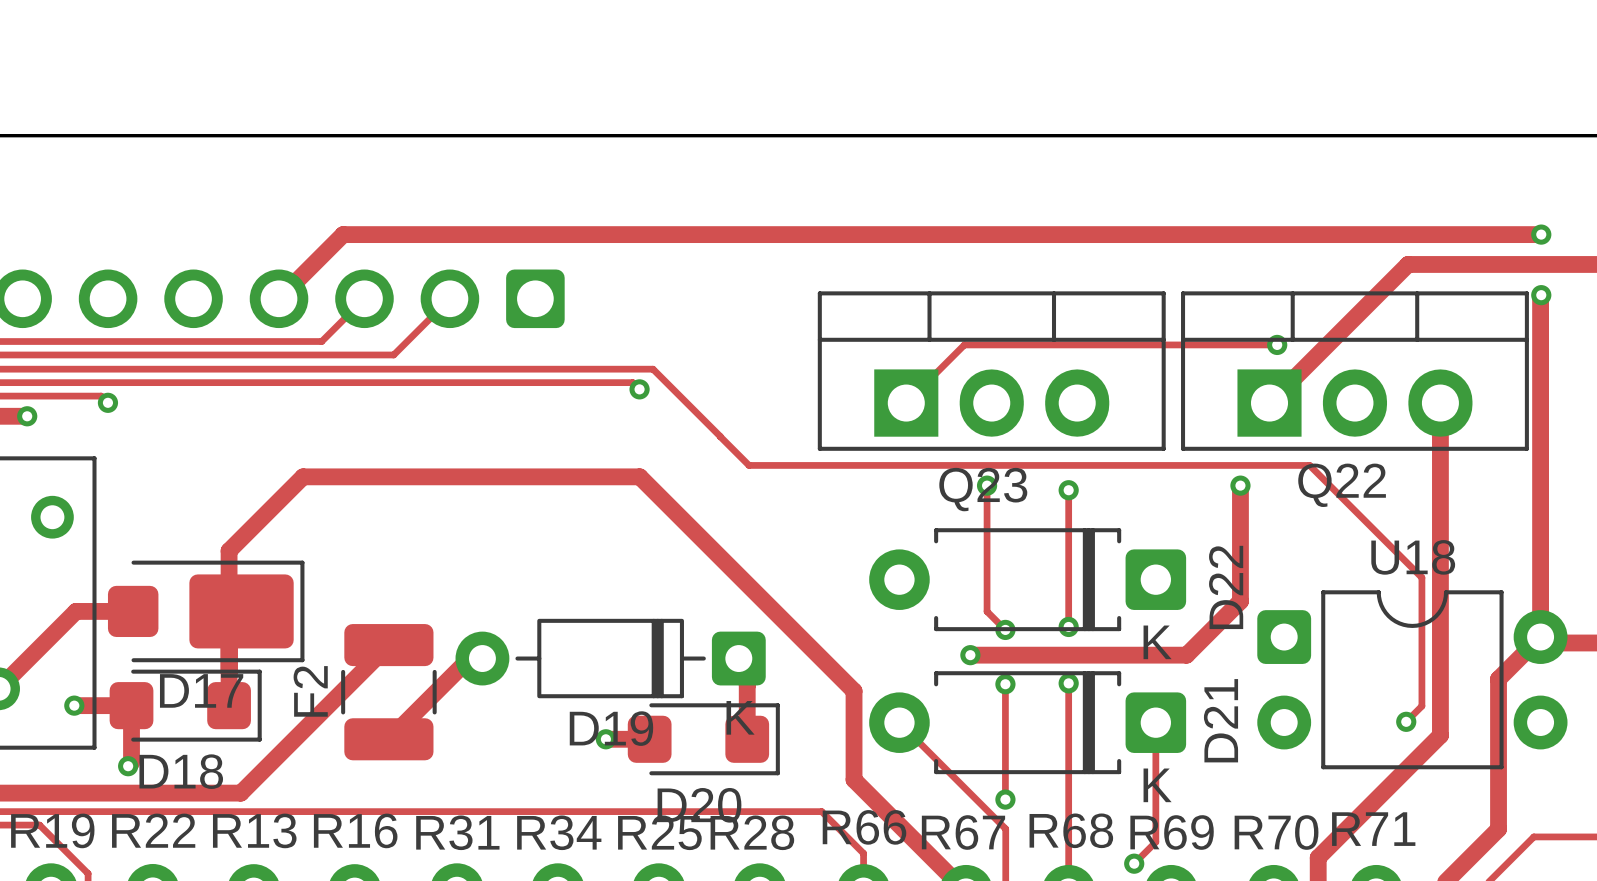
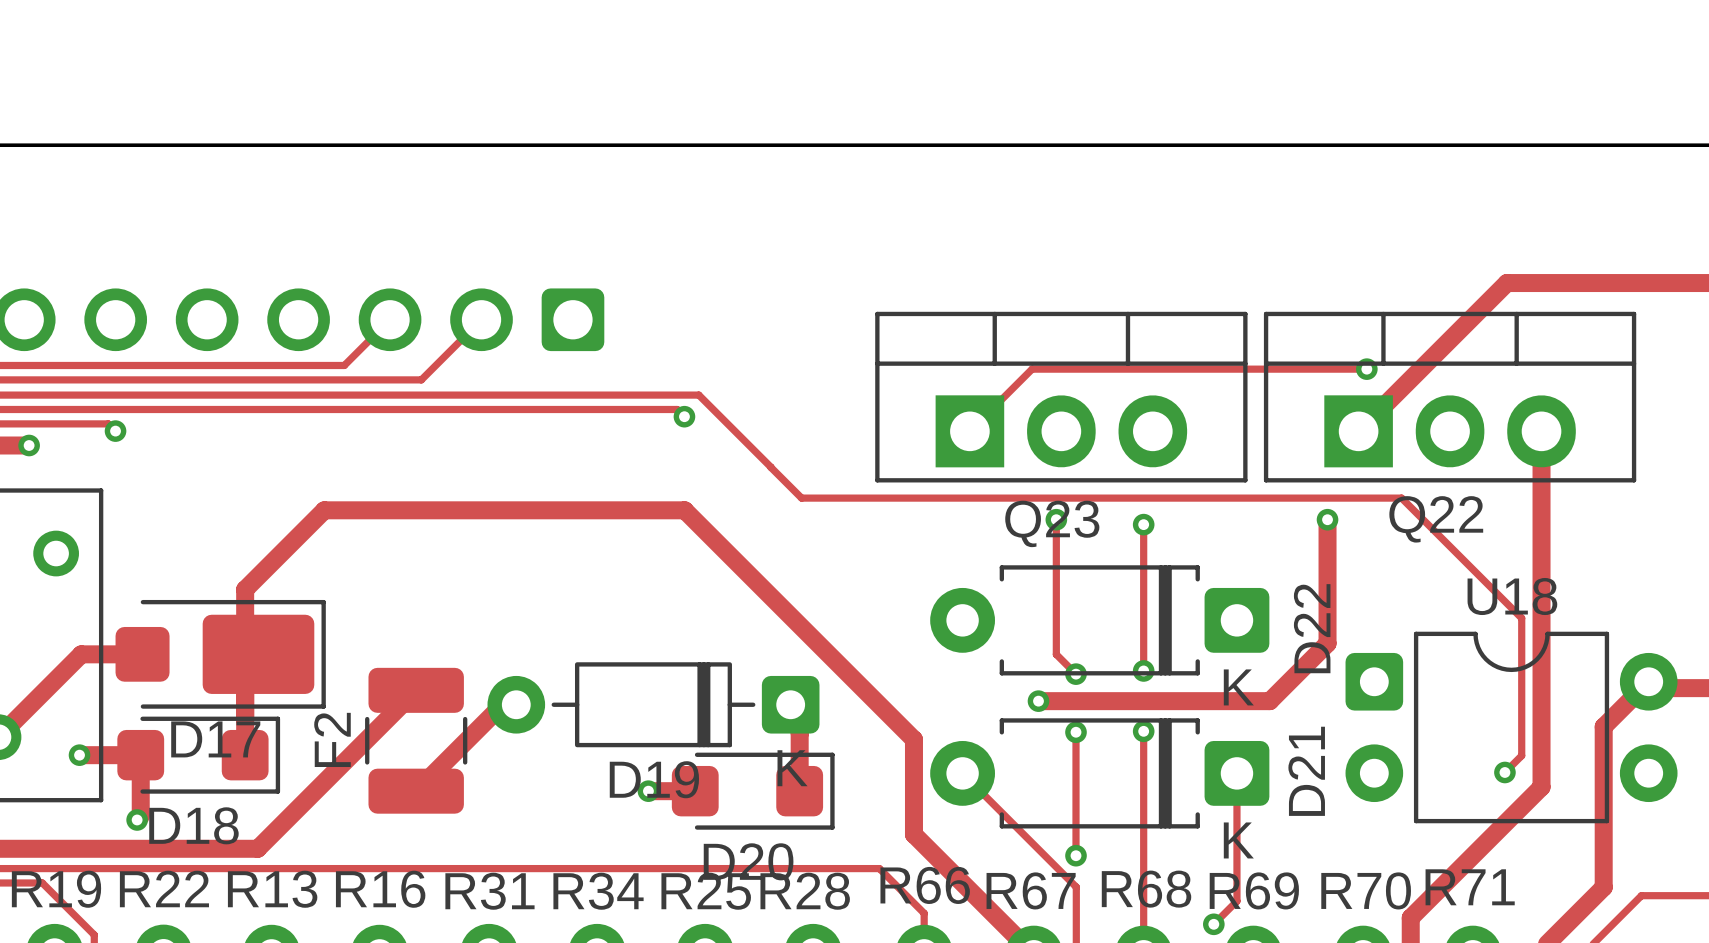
track: (1541, 234) (343, 234) (279, 298) -> none
via: (1541, 234) -> none
track: (1541, 295) (1540, 637) -> none
via: (1541, 295) -> none

